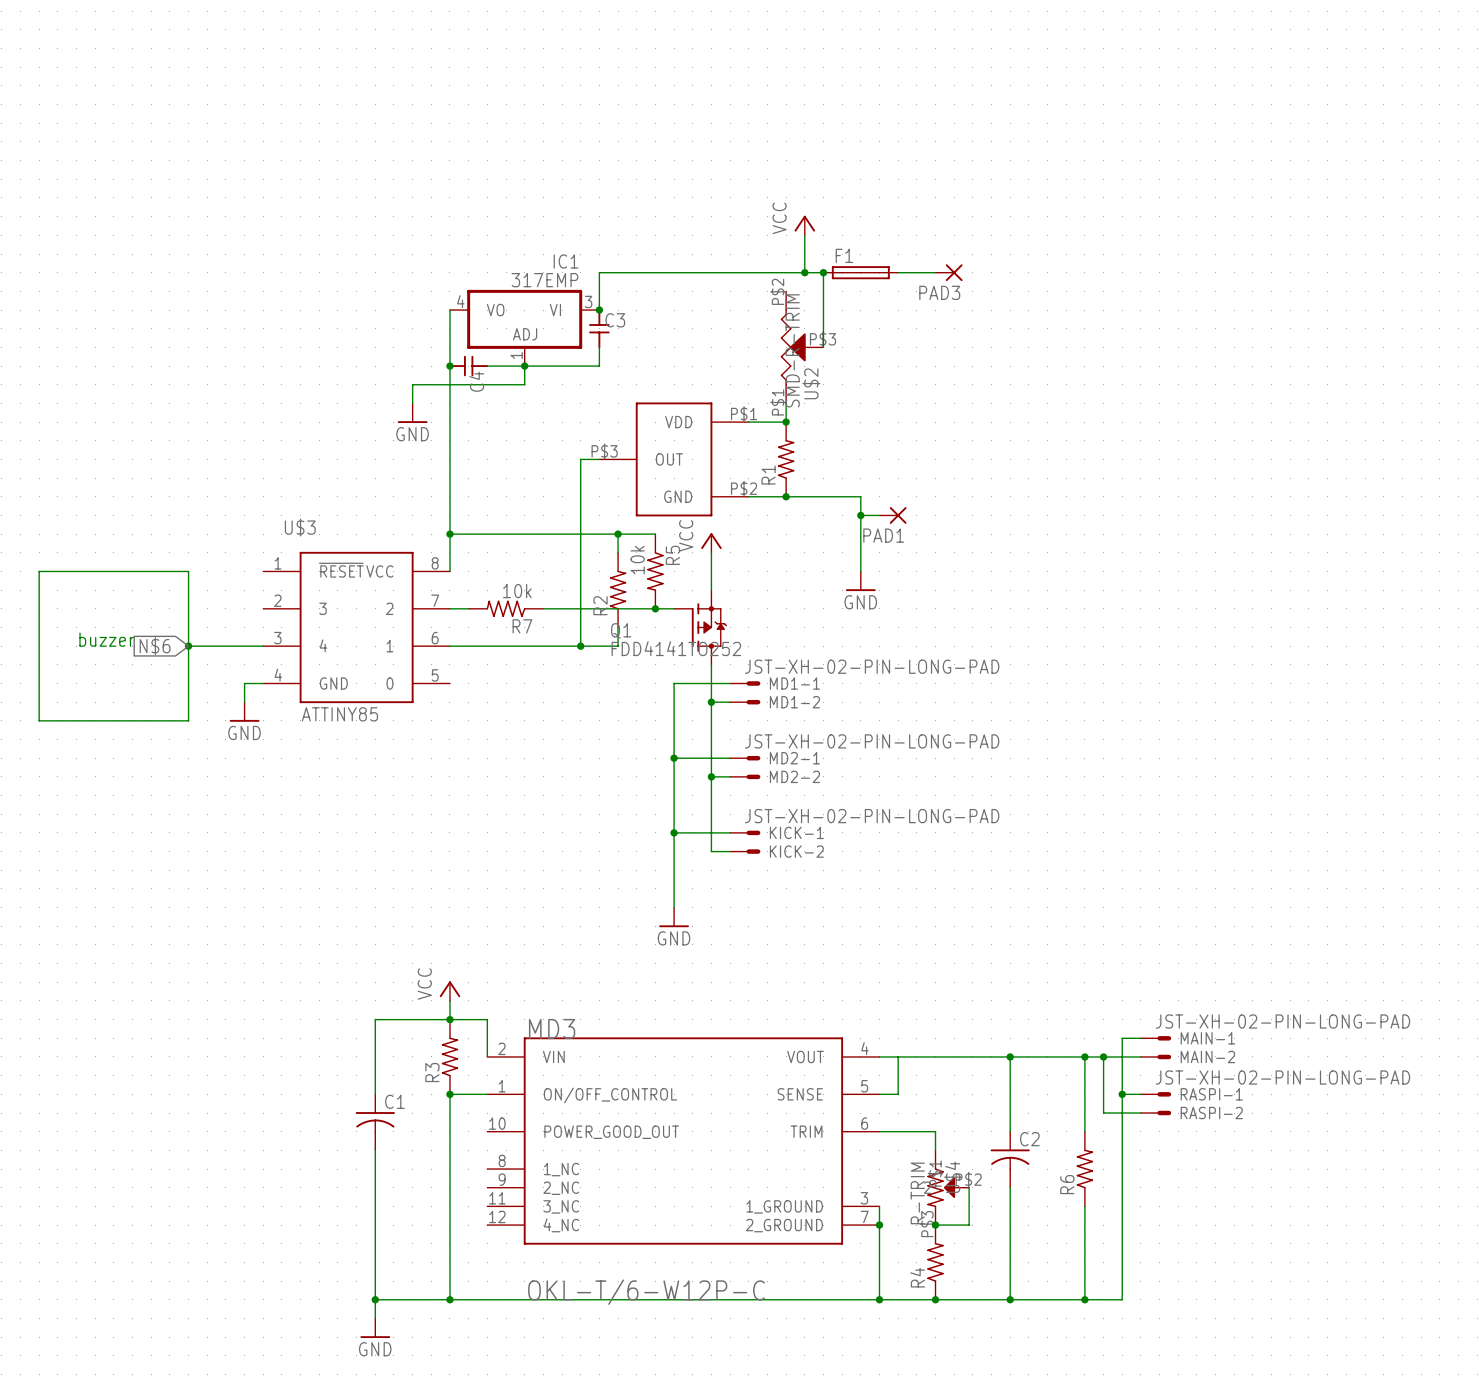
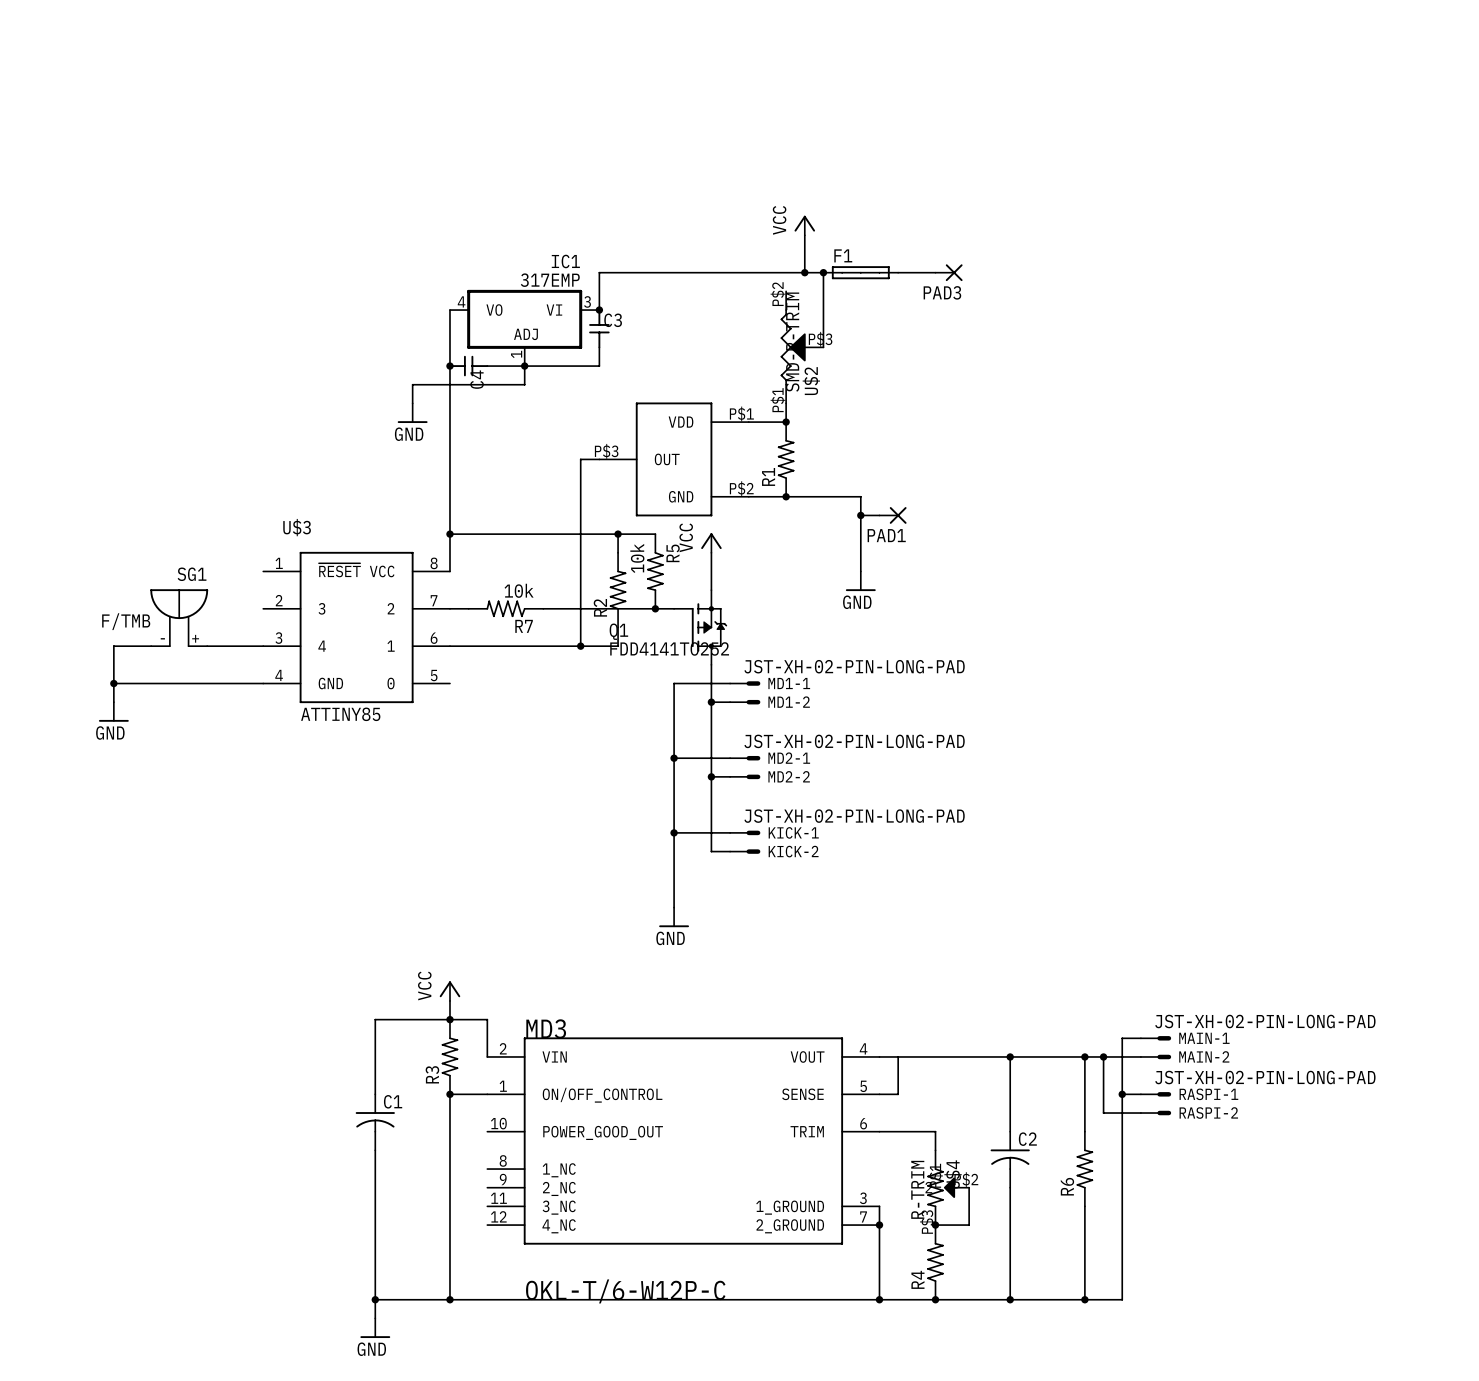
wire: (39, 571) (188, 571) (188, 720) (39, 720) (39, 571) -> none
SG1: none -> F/TMB (179, 617)
text: buzzer (106, 639) -> none
wire: none -> (151, 646) (113, 646) (113, 702)
global label: N$6 (155, 646) -> none
junction: (188, 646) -> none
junction: none -> (113, 683)
wire: (244, 683) (244, 702) -> (244, 683) (113, 683)
power symbol position: GND (244, 711) -> GND (113, 711)

